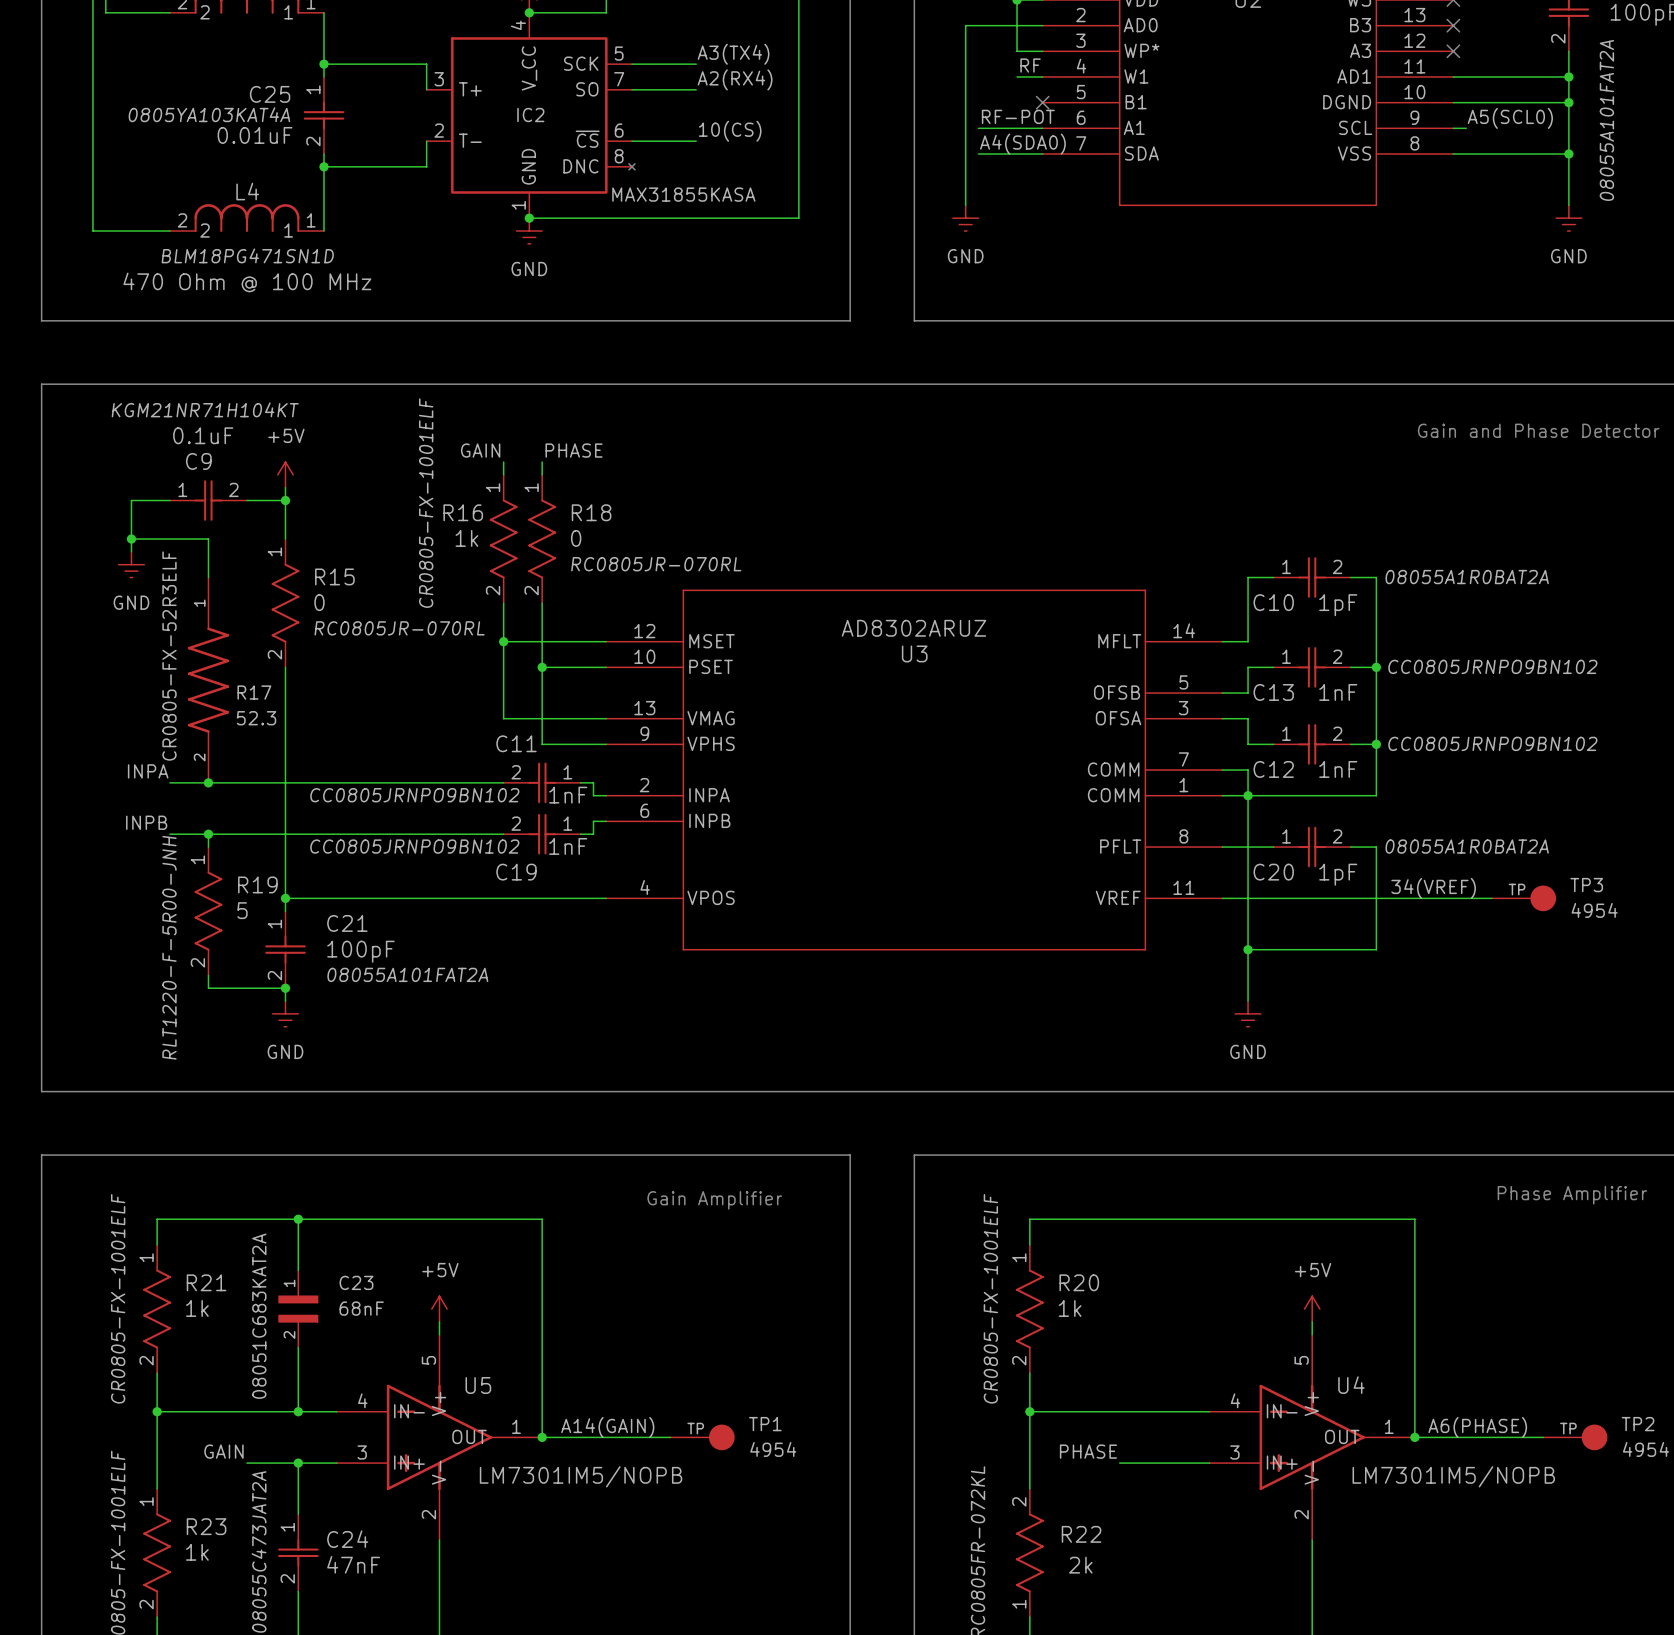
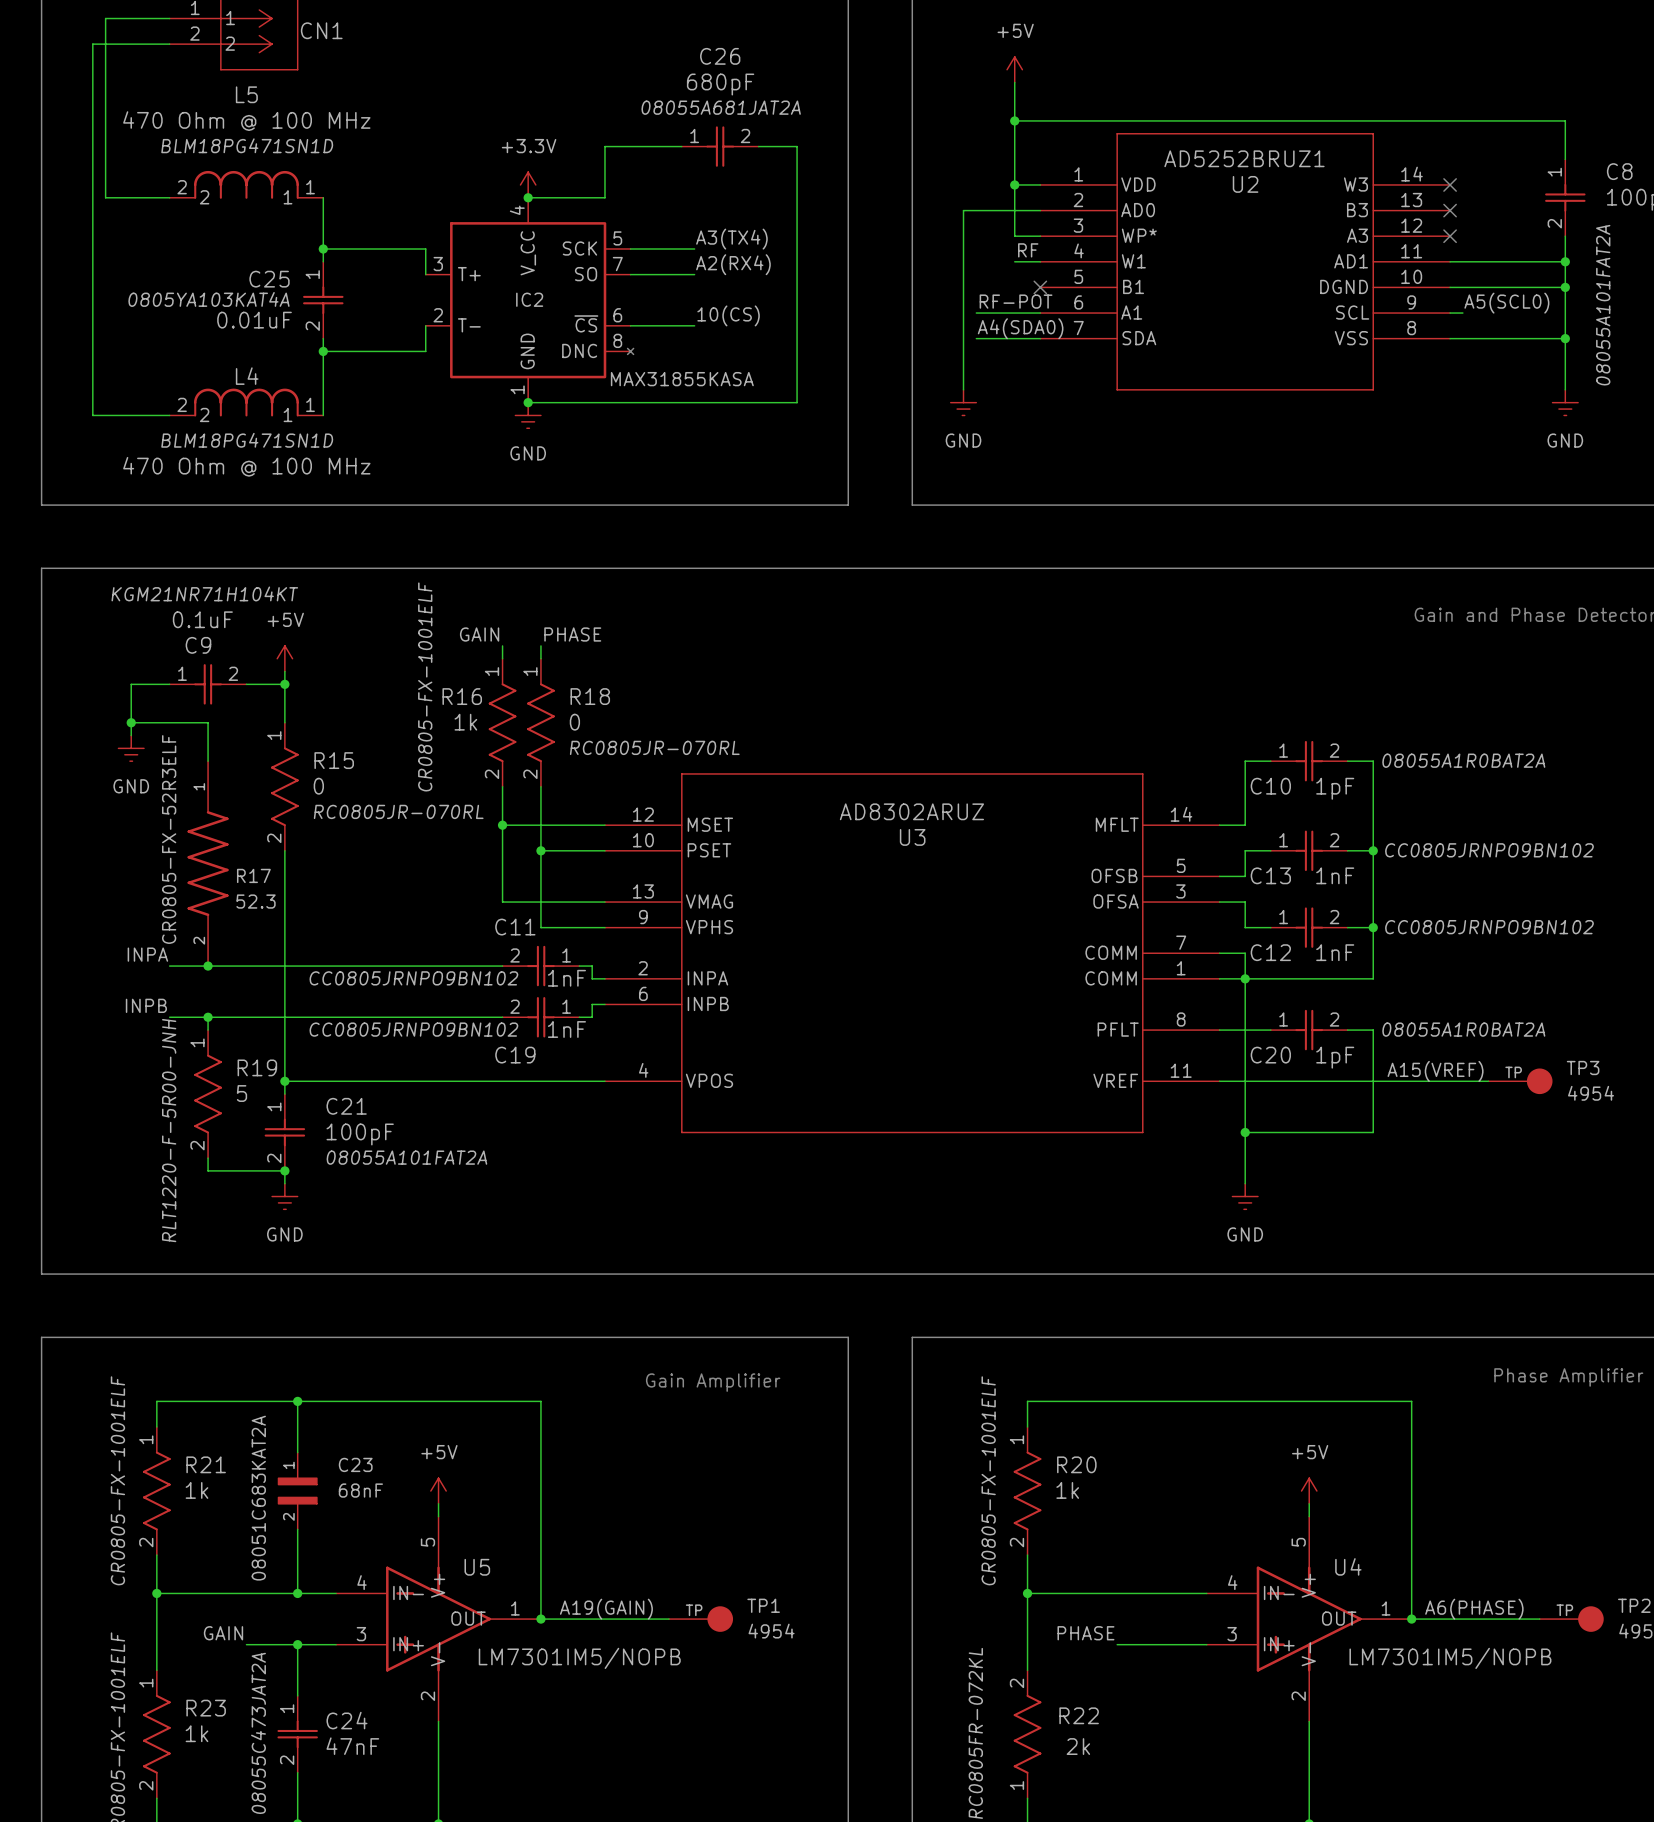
label: 34(VREF) (1433, 888) -> A15(VREF) (1435, 1071)
label: A14(GAIN) (607, 1427) -> A19(GAIN) (606, 1609)

